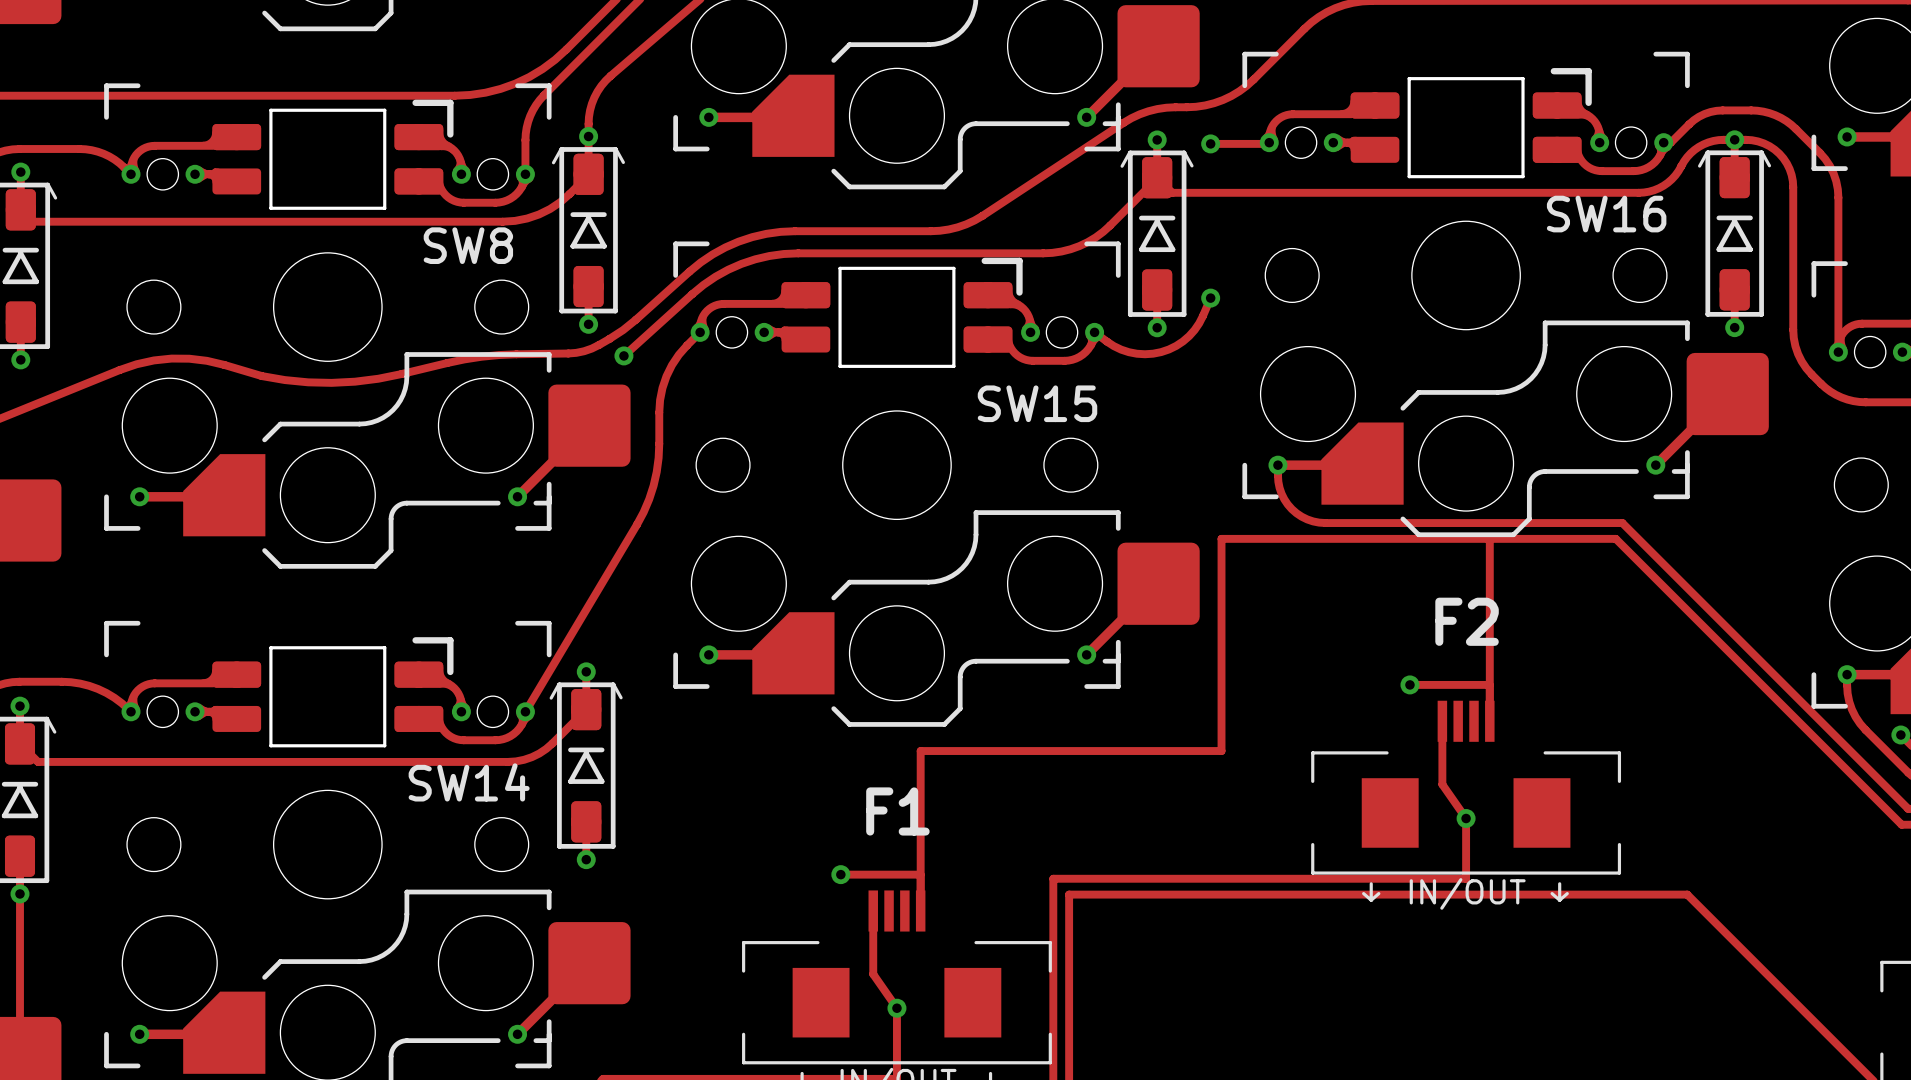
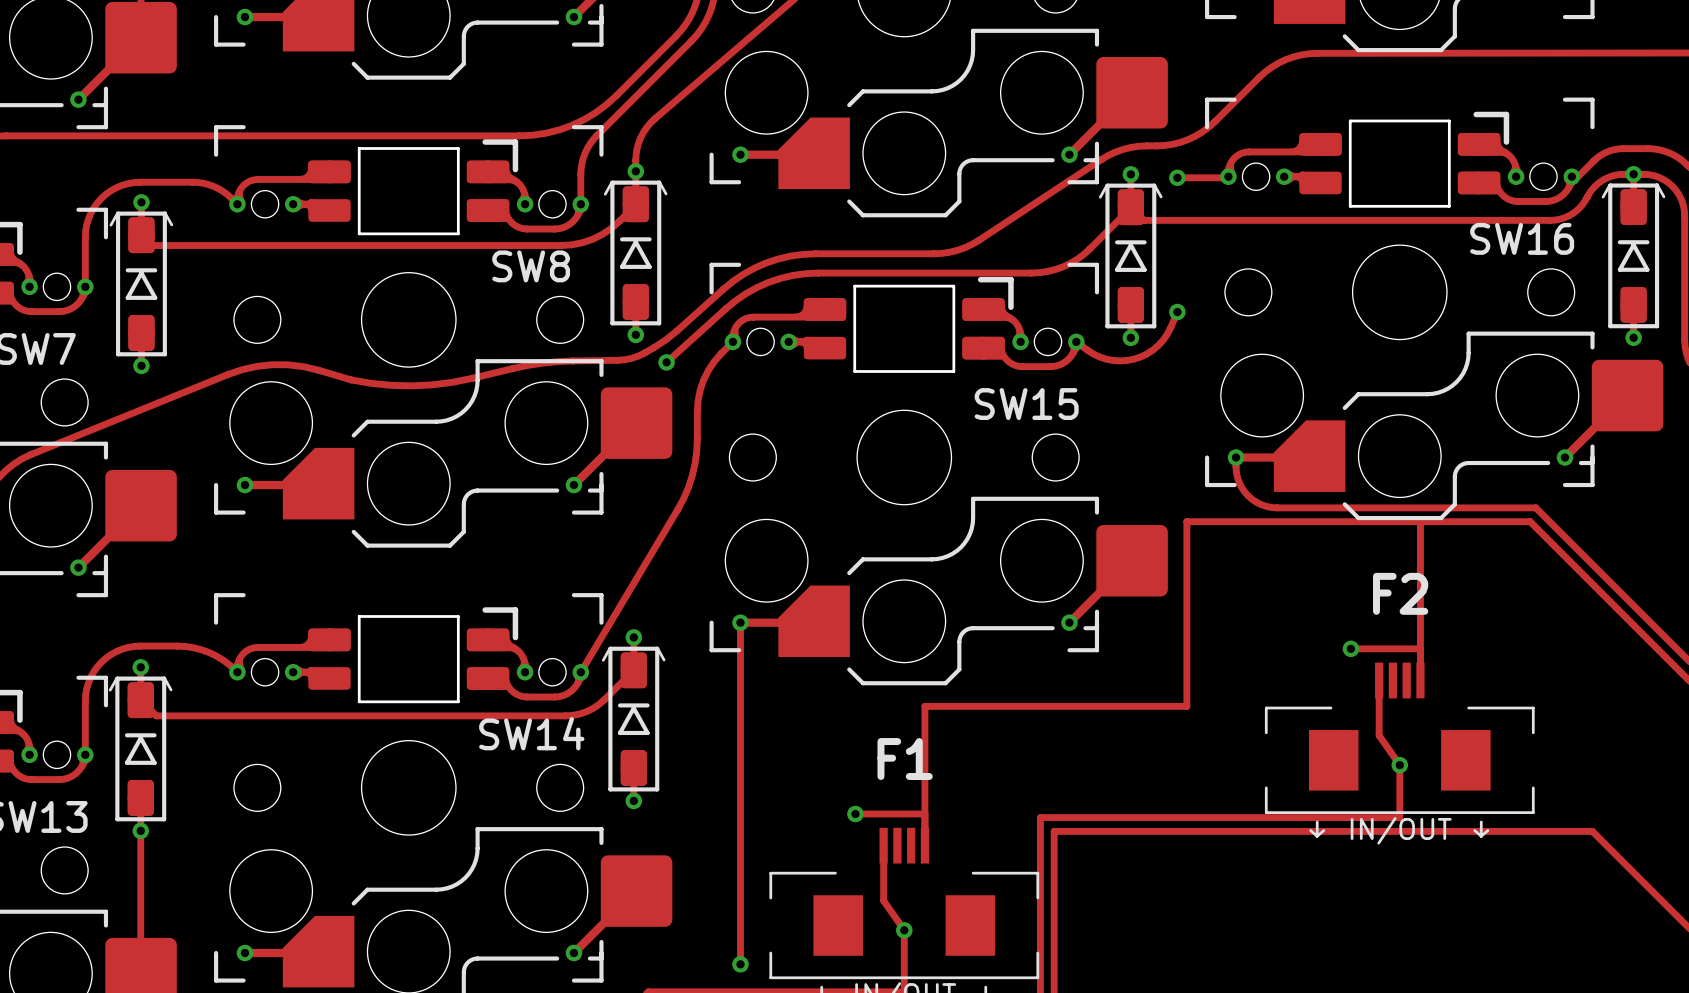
track: none -> (740, 622) (740, 964)
via: none -> (740, 964)

